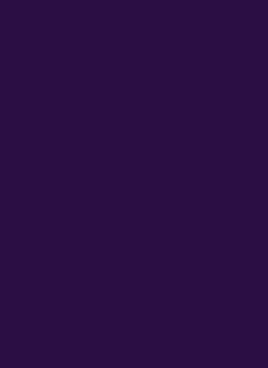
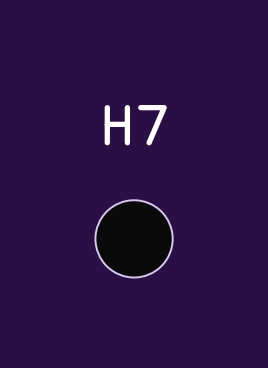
H7: none -> (134, 238)

